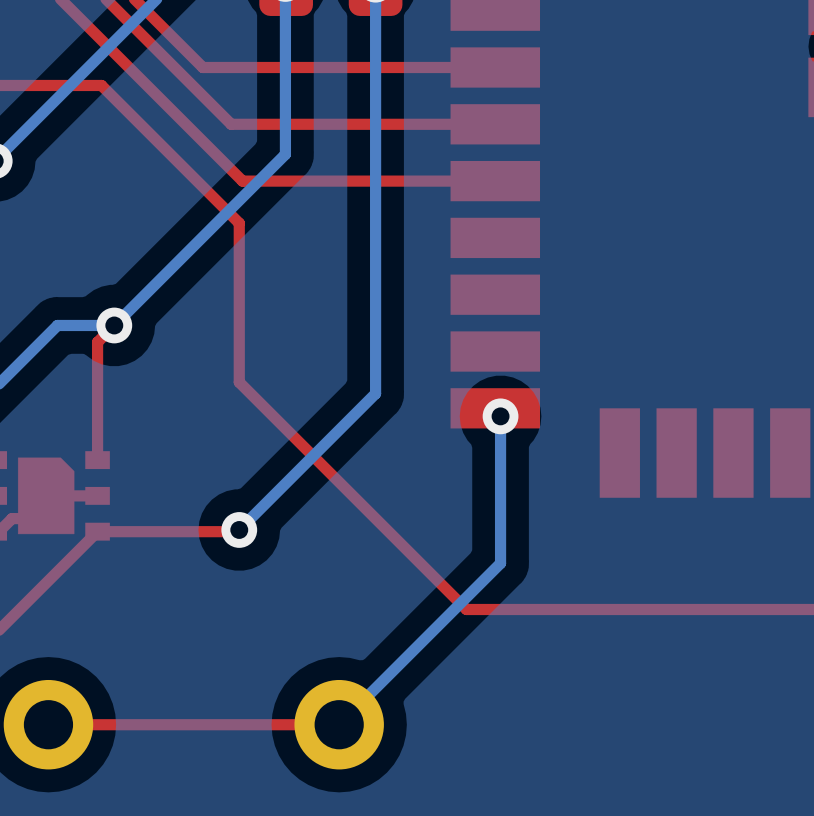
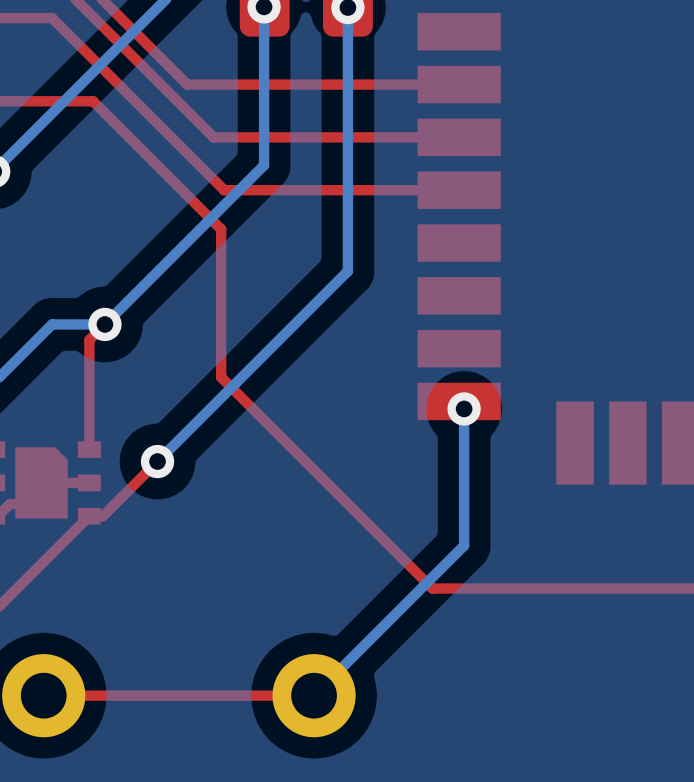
bottom track: (375, 268) (375, 393) (239, 529) -> (347, 271) (157, 461)
top track: (239, 529) (237, 531) (112, 531) -> (157, 461) (102, 516)
via position: (239, 529) -> (157, 461)

